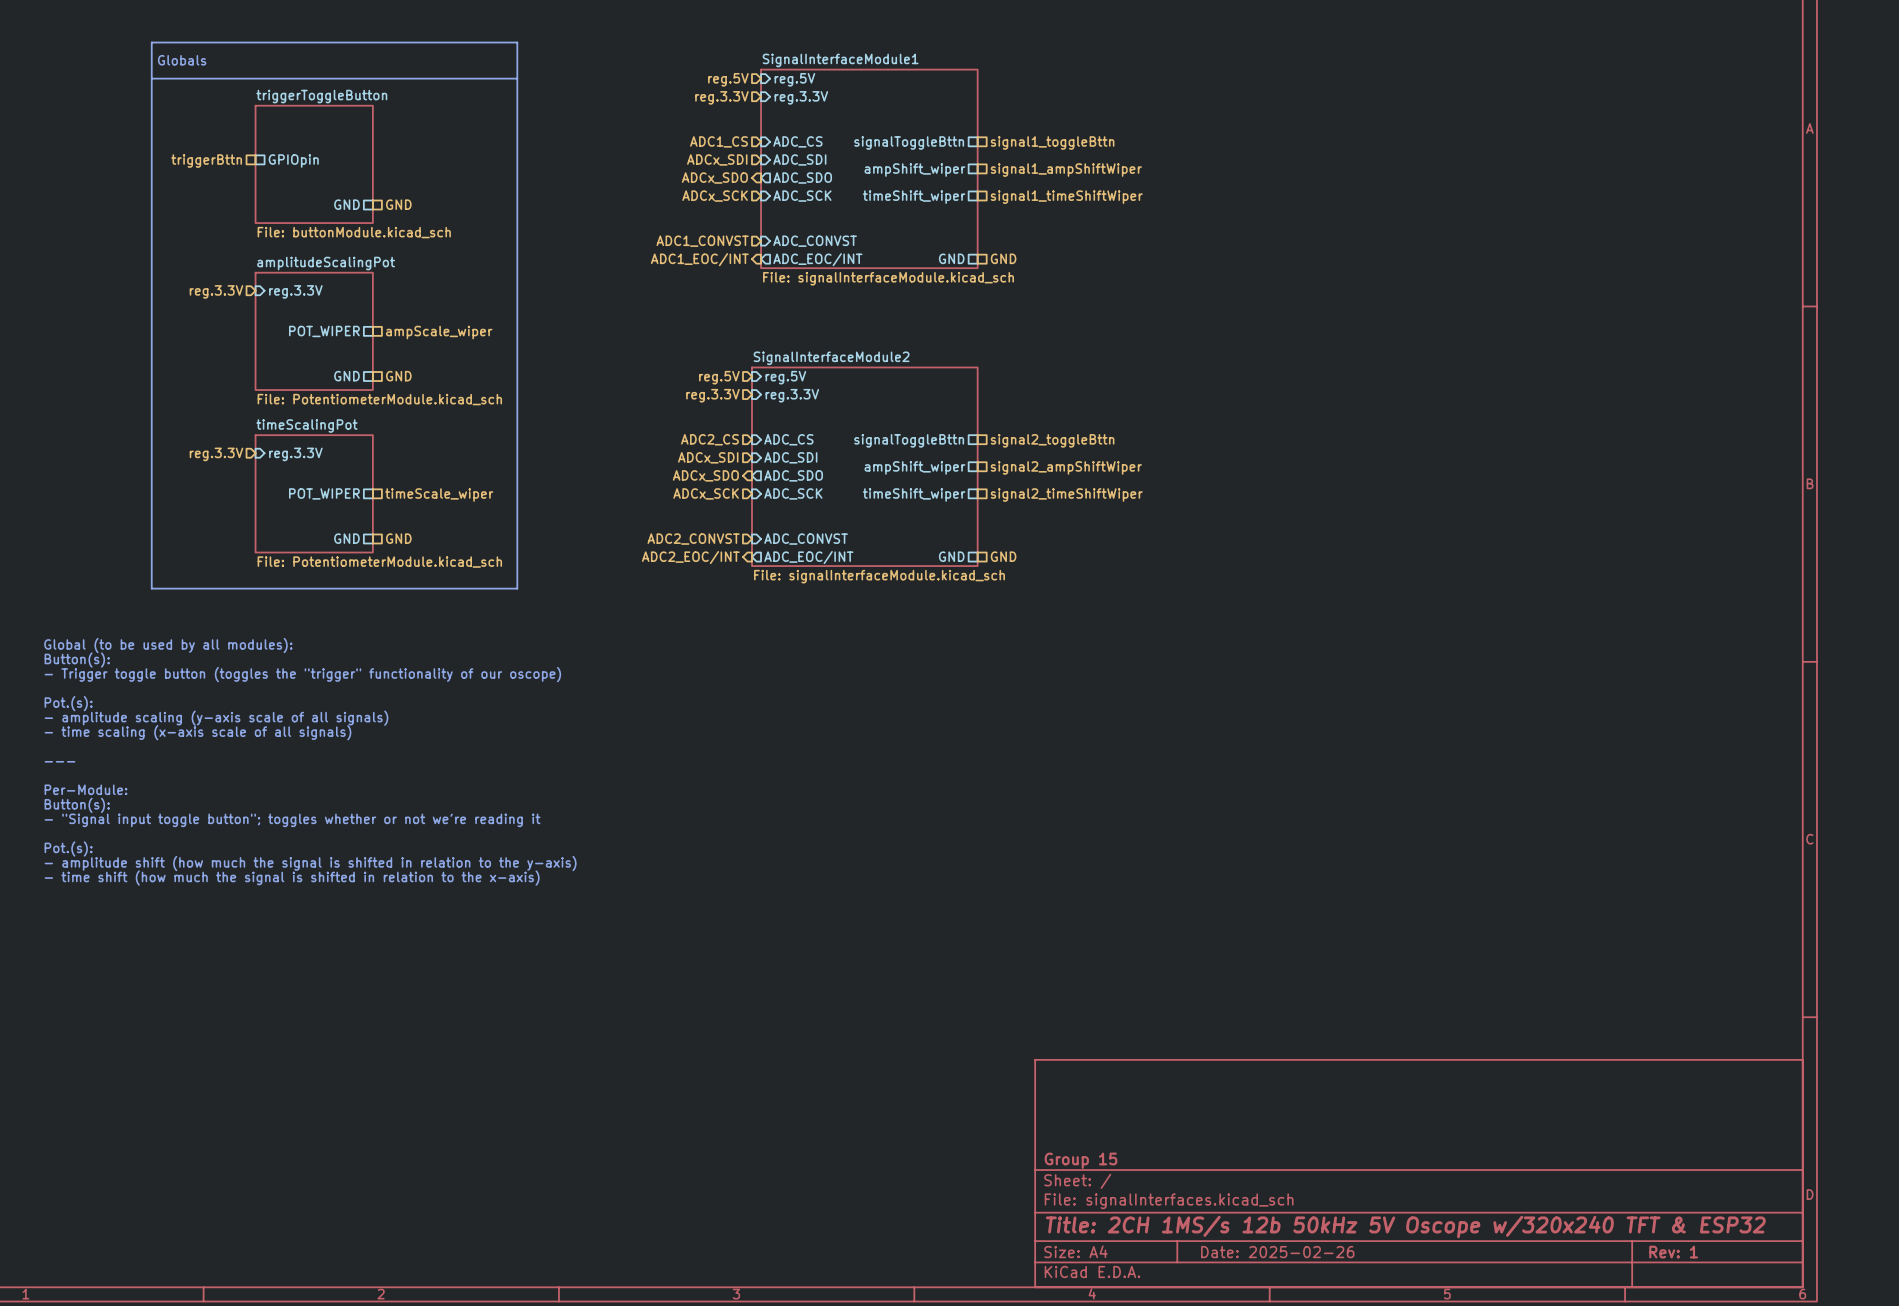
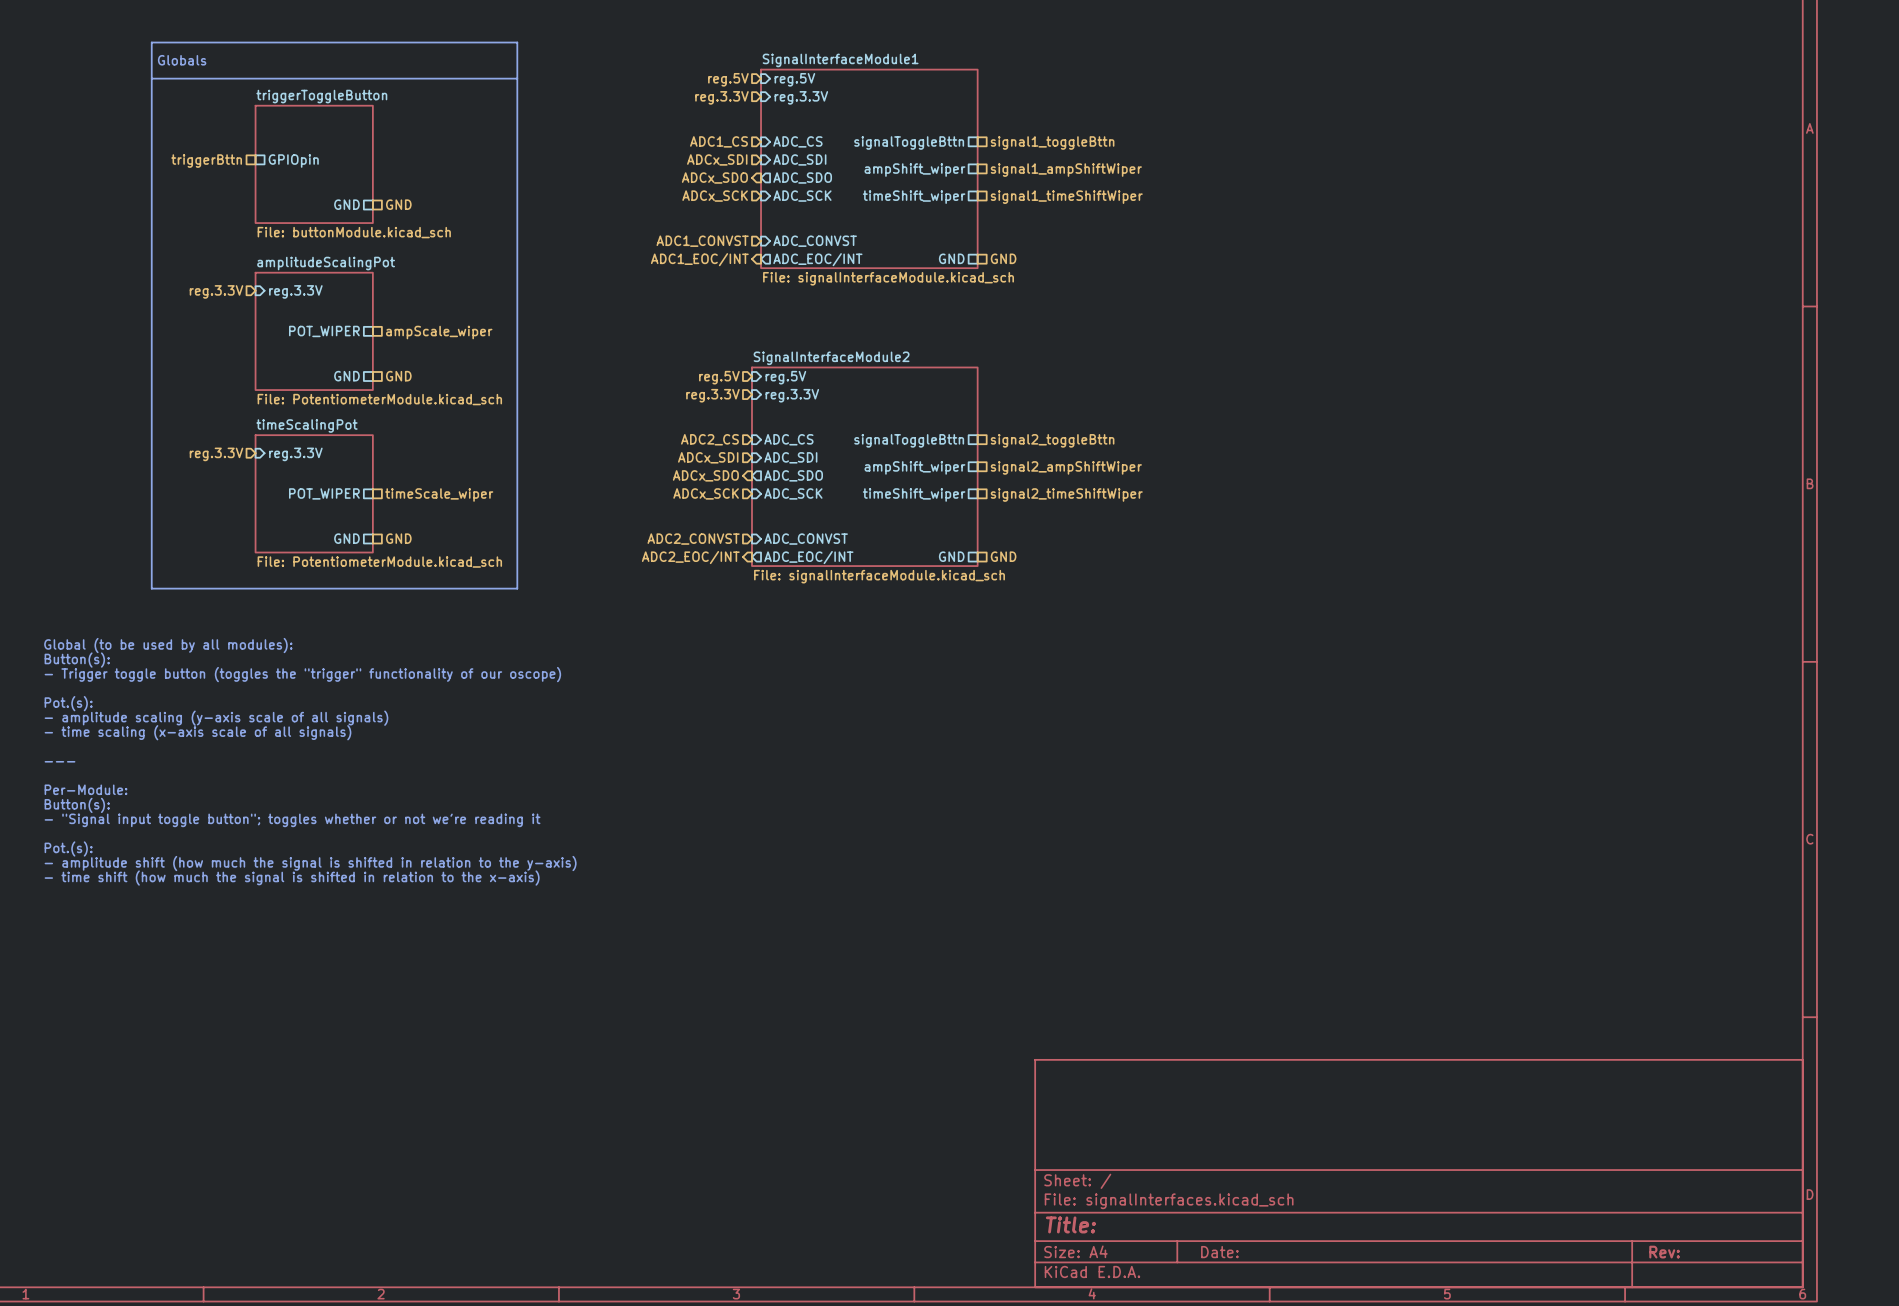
title block: Group 15 (1080, 1160) -> none
title block: Title: 2CH 1MS/s 12b 50kHz 5V Oscope w/320x240 TFT & ESP32 (1405, 1226) -> Title: (1070, 1224)
title block: Date: 2025-02-26 (1277, 1252) -> Date: (1219, 1252)
title block: Rev: 1 (1673, 1252) -> Rev: (1664, 1252)

